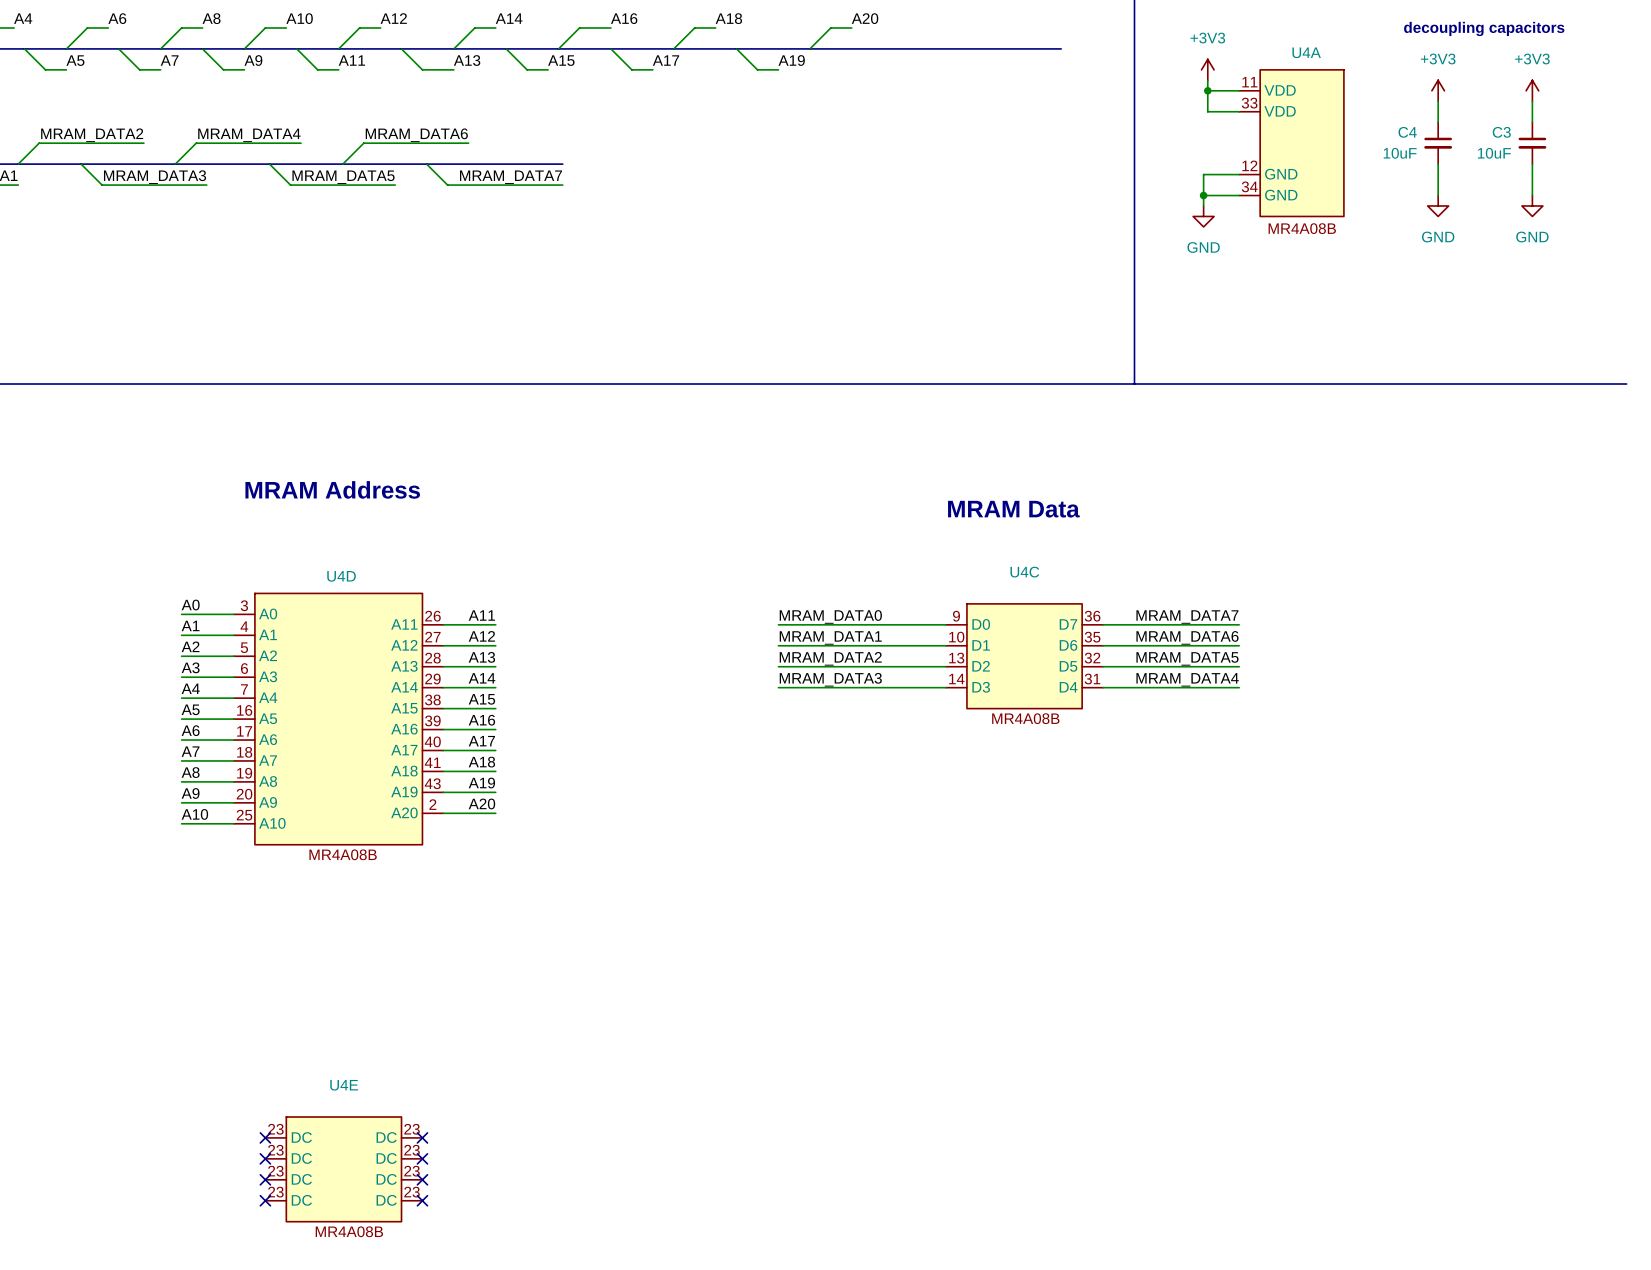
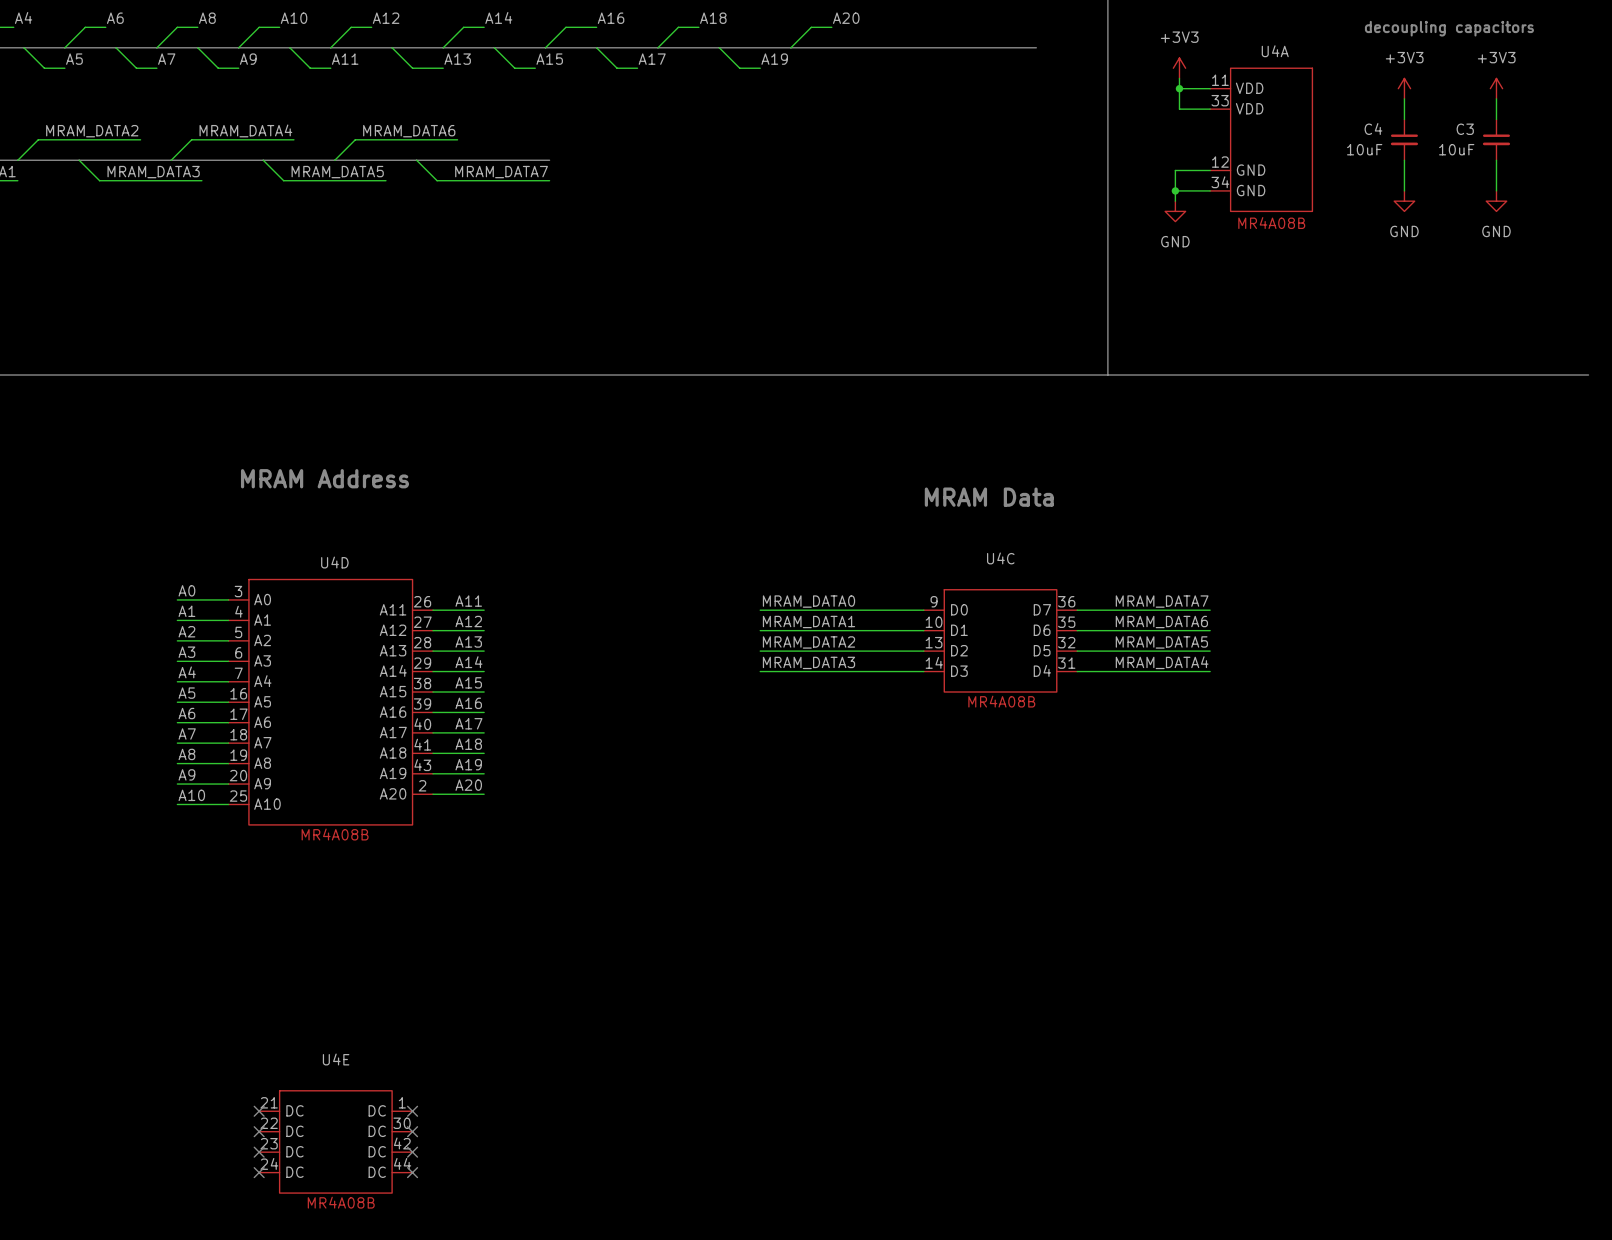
U4E pin number: 23 (275, 1129) -> 21 (269, 1102)
U4E pin number: 23 (412, 1129) -> 1 (402, 1102)
U4E pin number: 23 (275, 1150) -> 22 (269, 1123)
U4E pin number: 23 (412, 1150) -> 30 (402, 1123)
U4E pin number: 23 (412, 1171) -> 42 (402, 1143)
U4E pin number: 23 (275, 1192) -> 24 (269, 1163)
U4E pin number: 23 (412, 1192) -> 44 (402, 1163)

